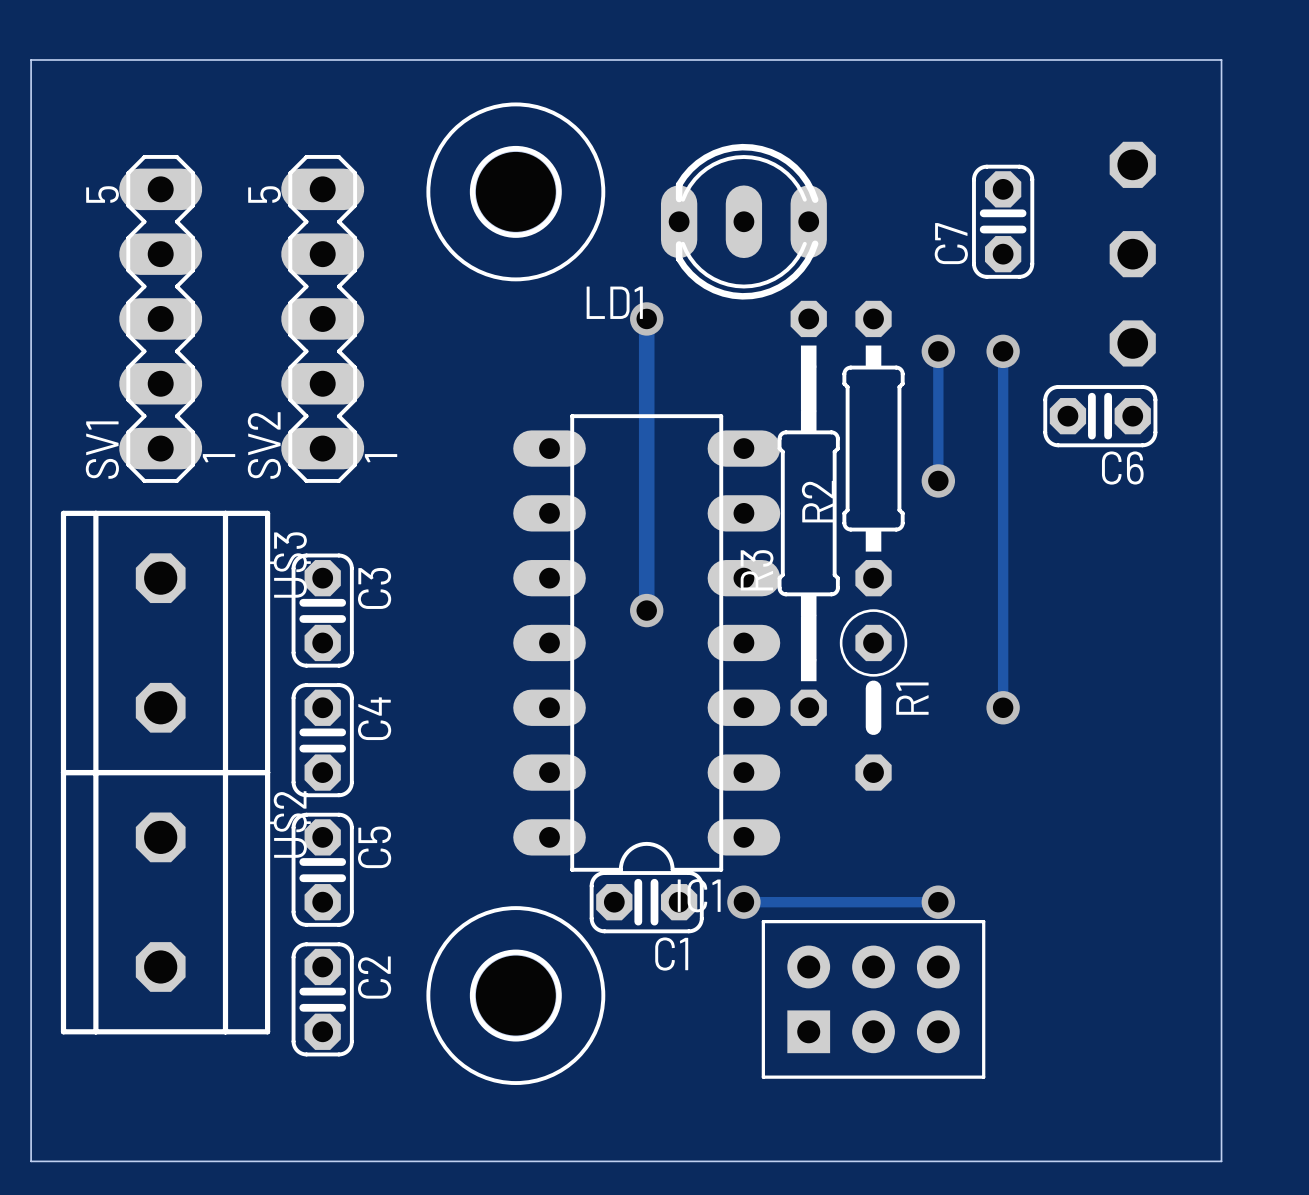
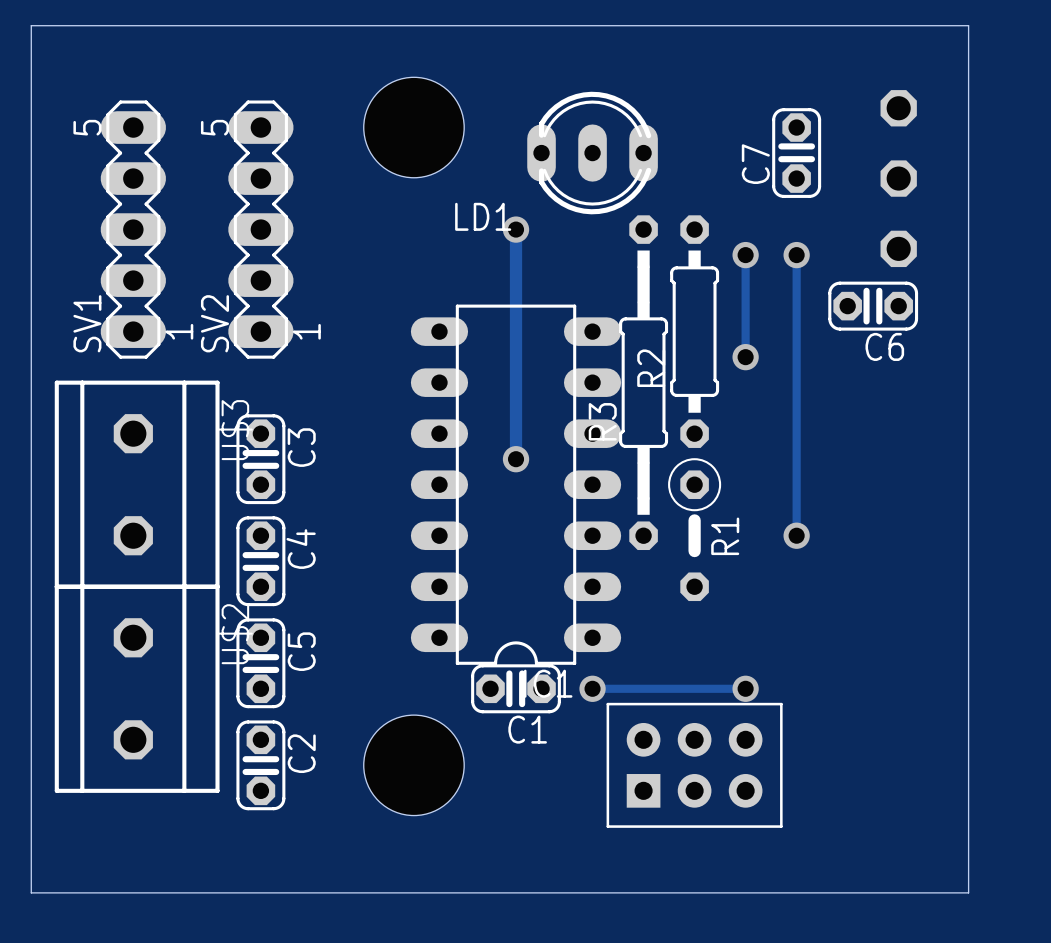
hole: none -> (413, 127)
part: (515, 191) -> none
part: (515, 995) -> none
hole: none -> (413, 765)

